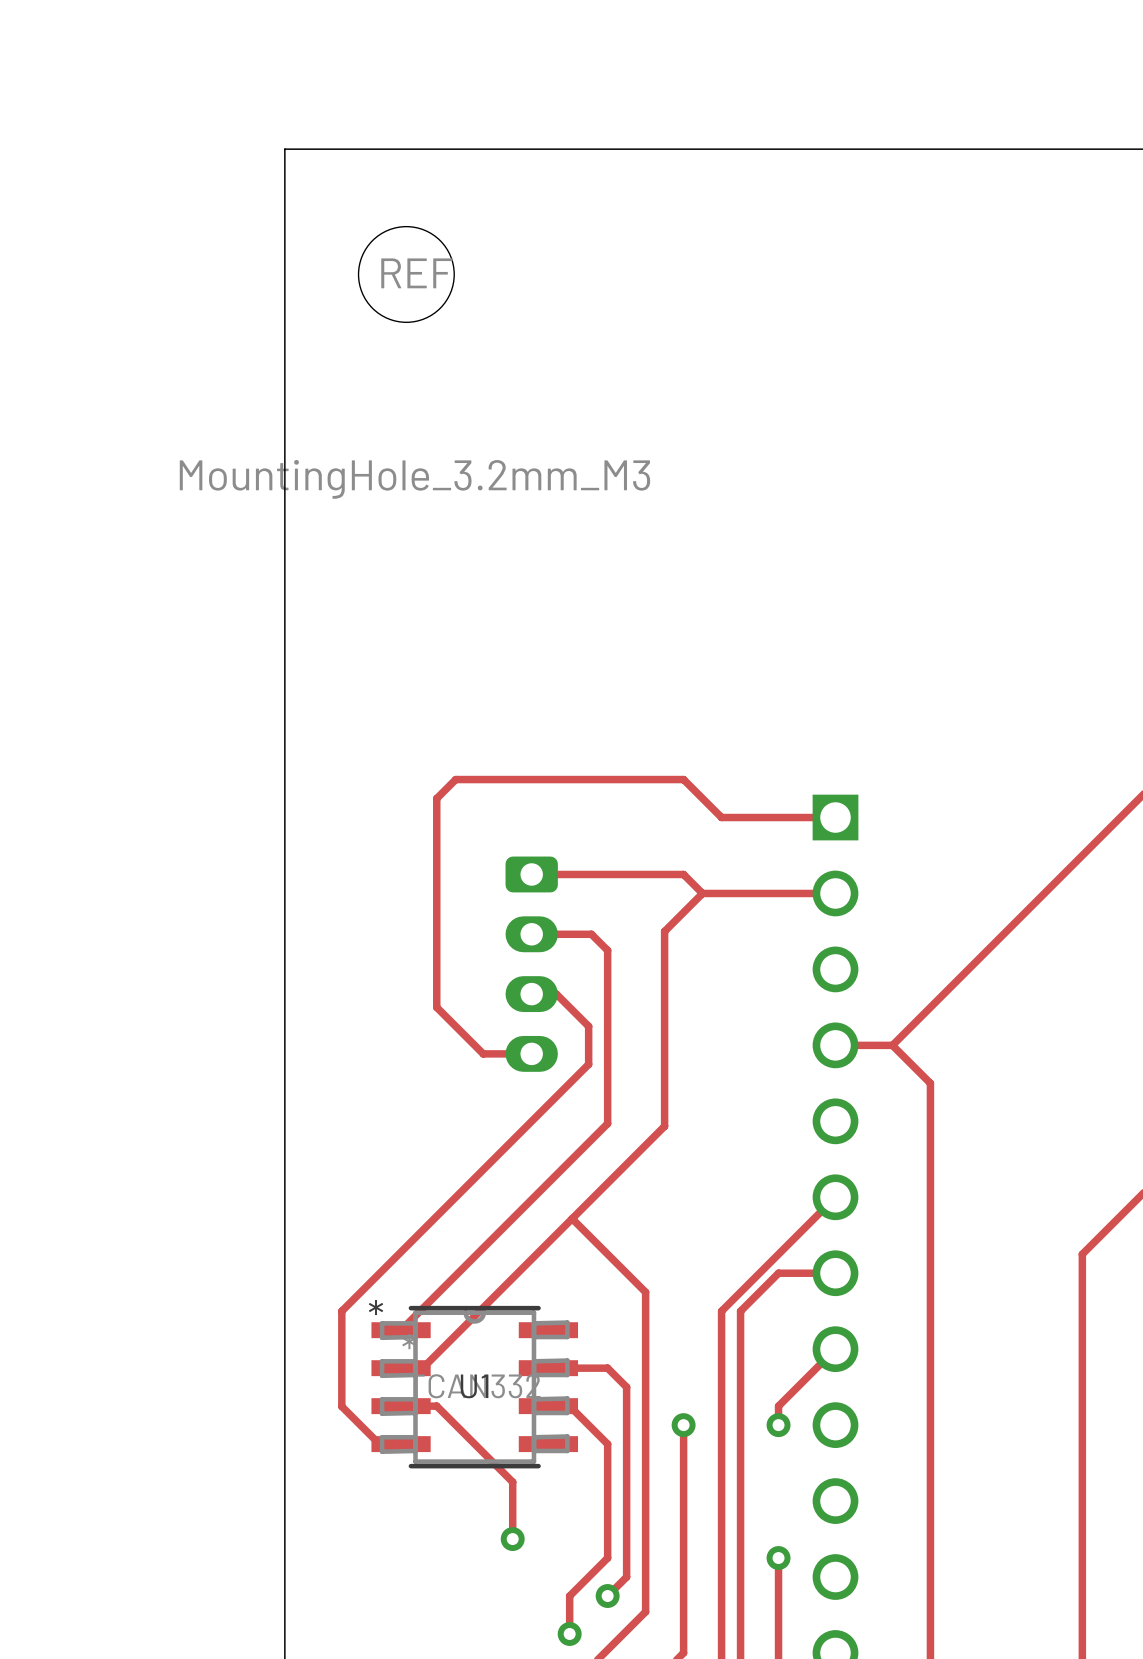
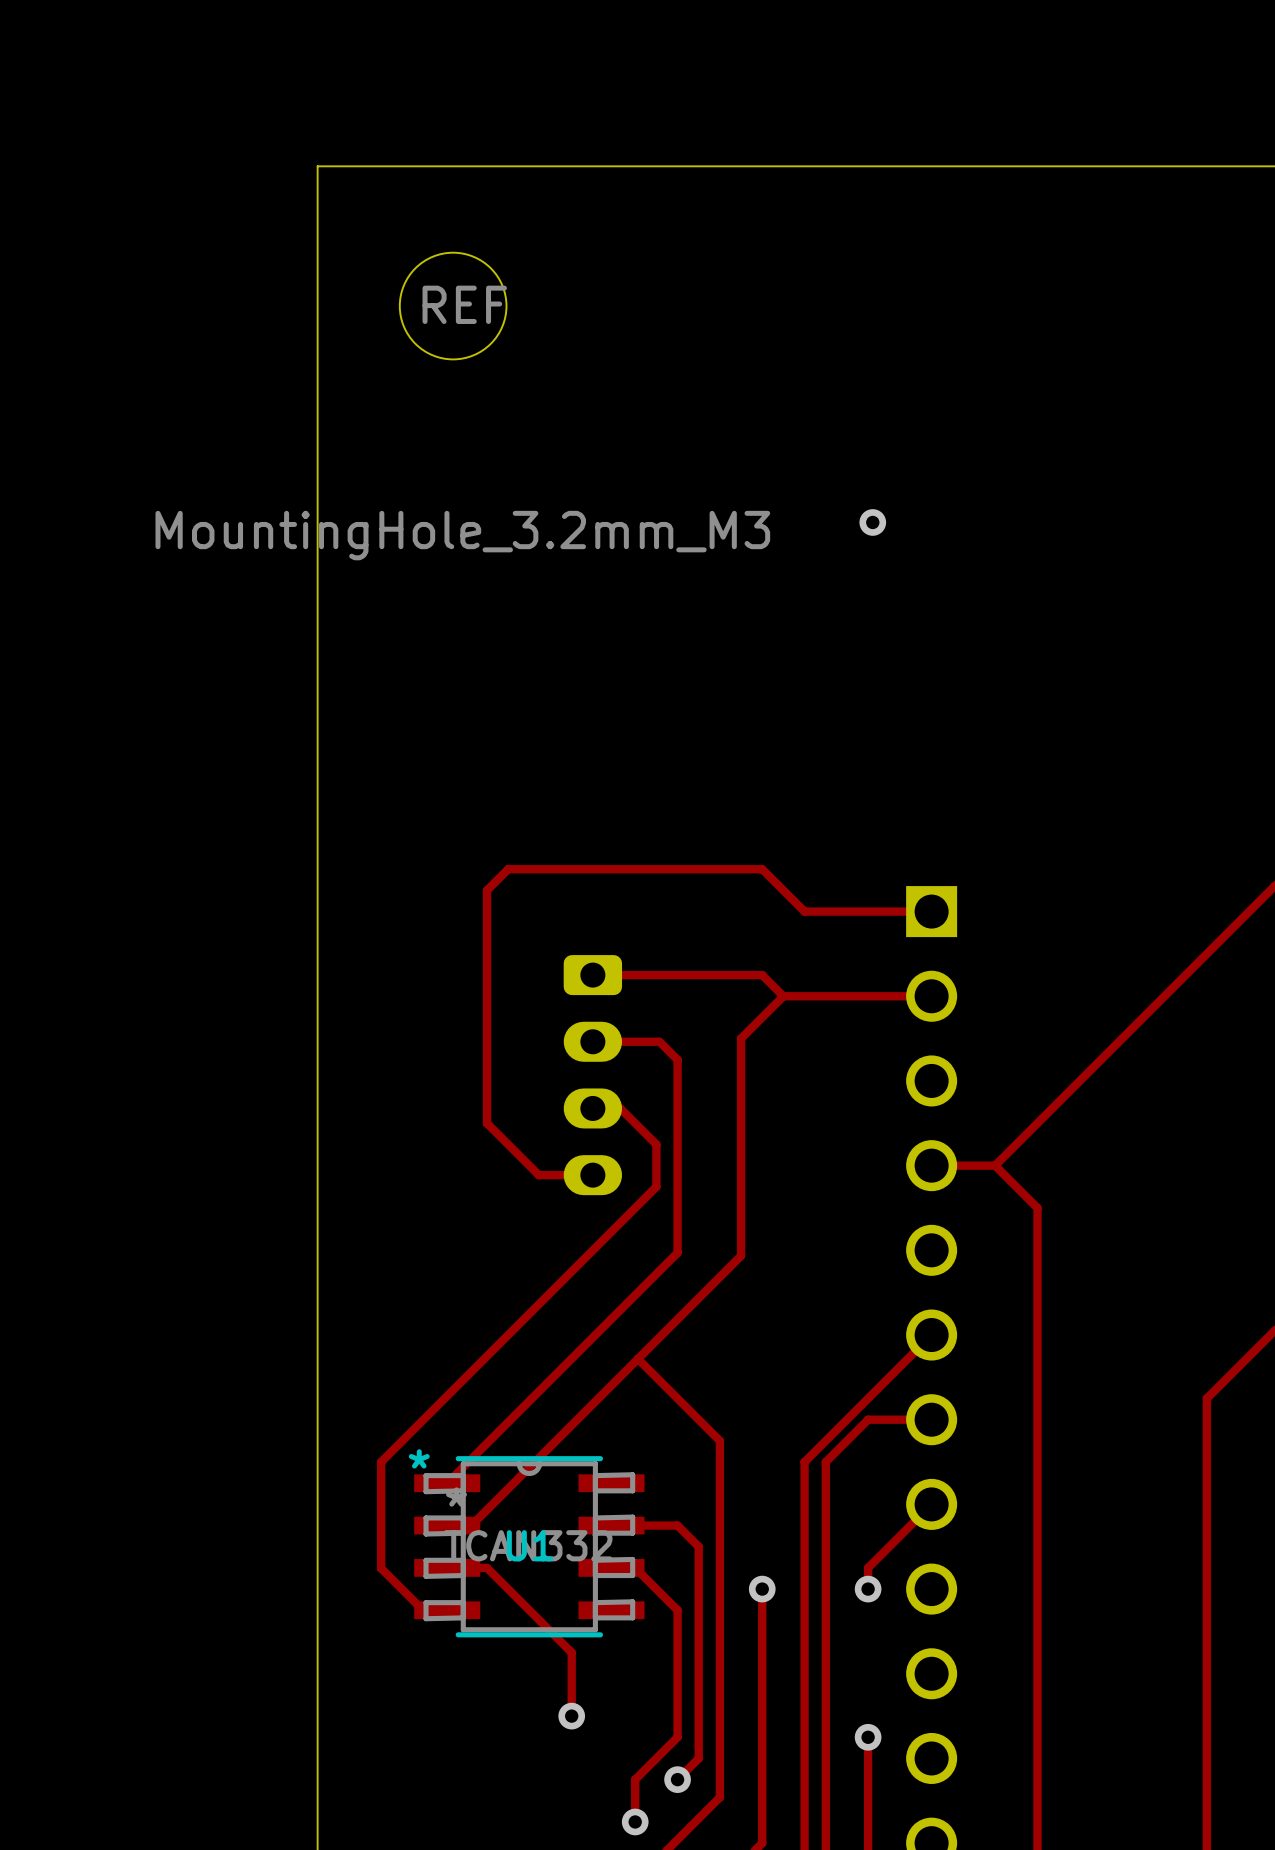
via: none -> (872, 522)

